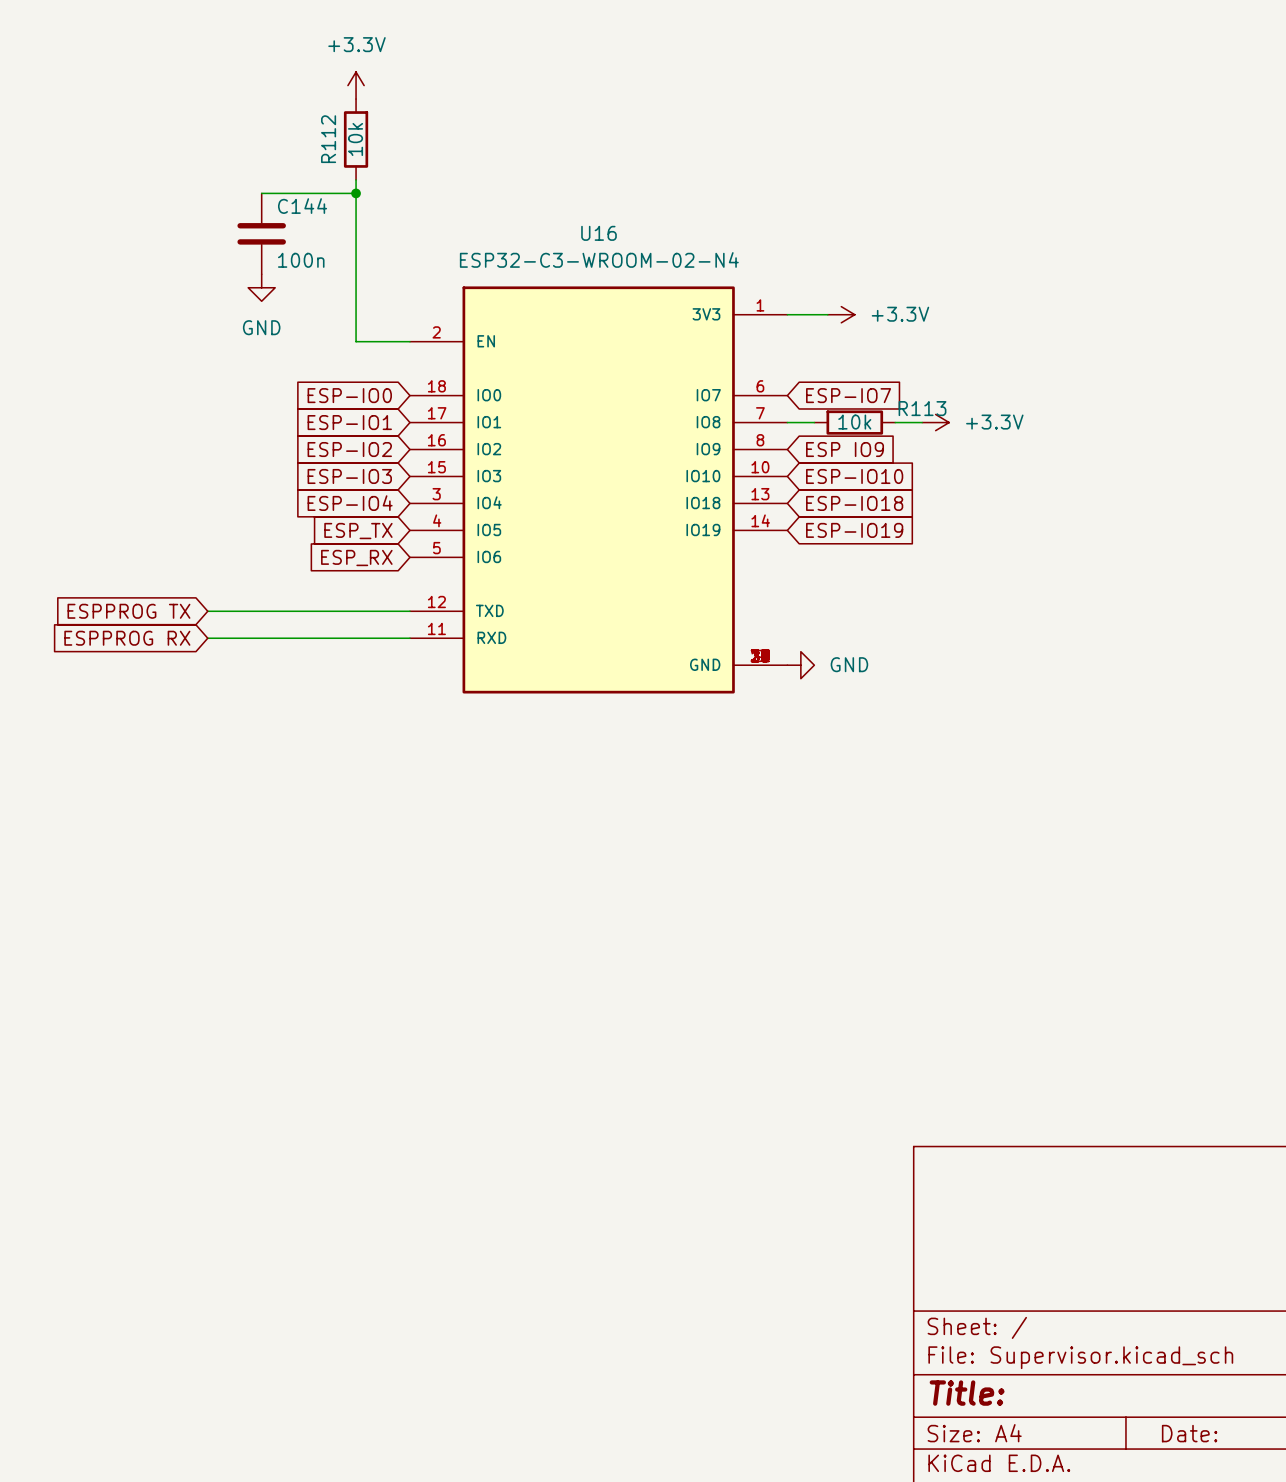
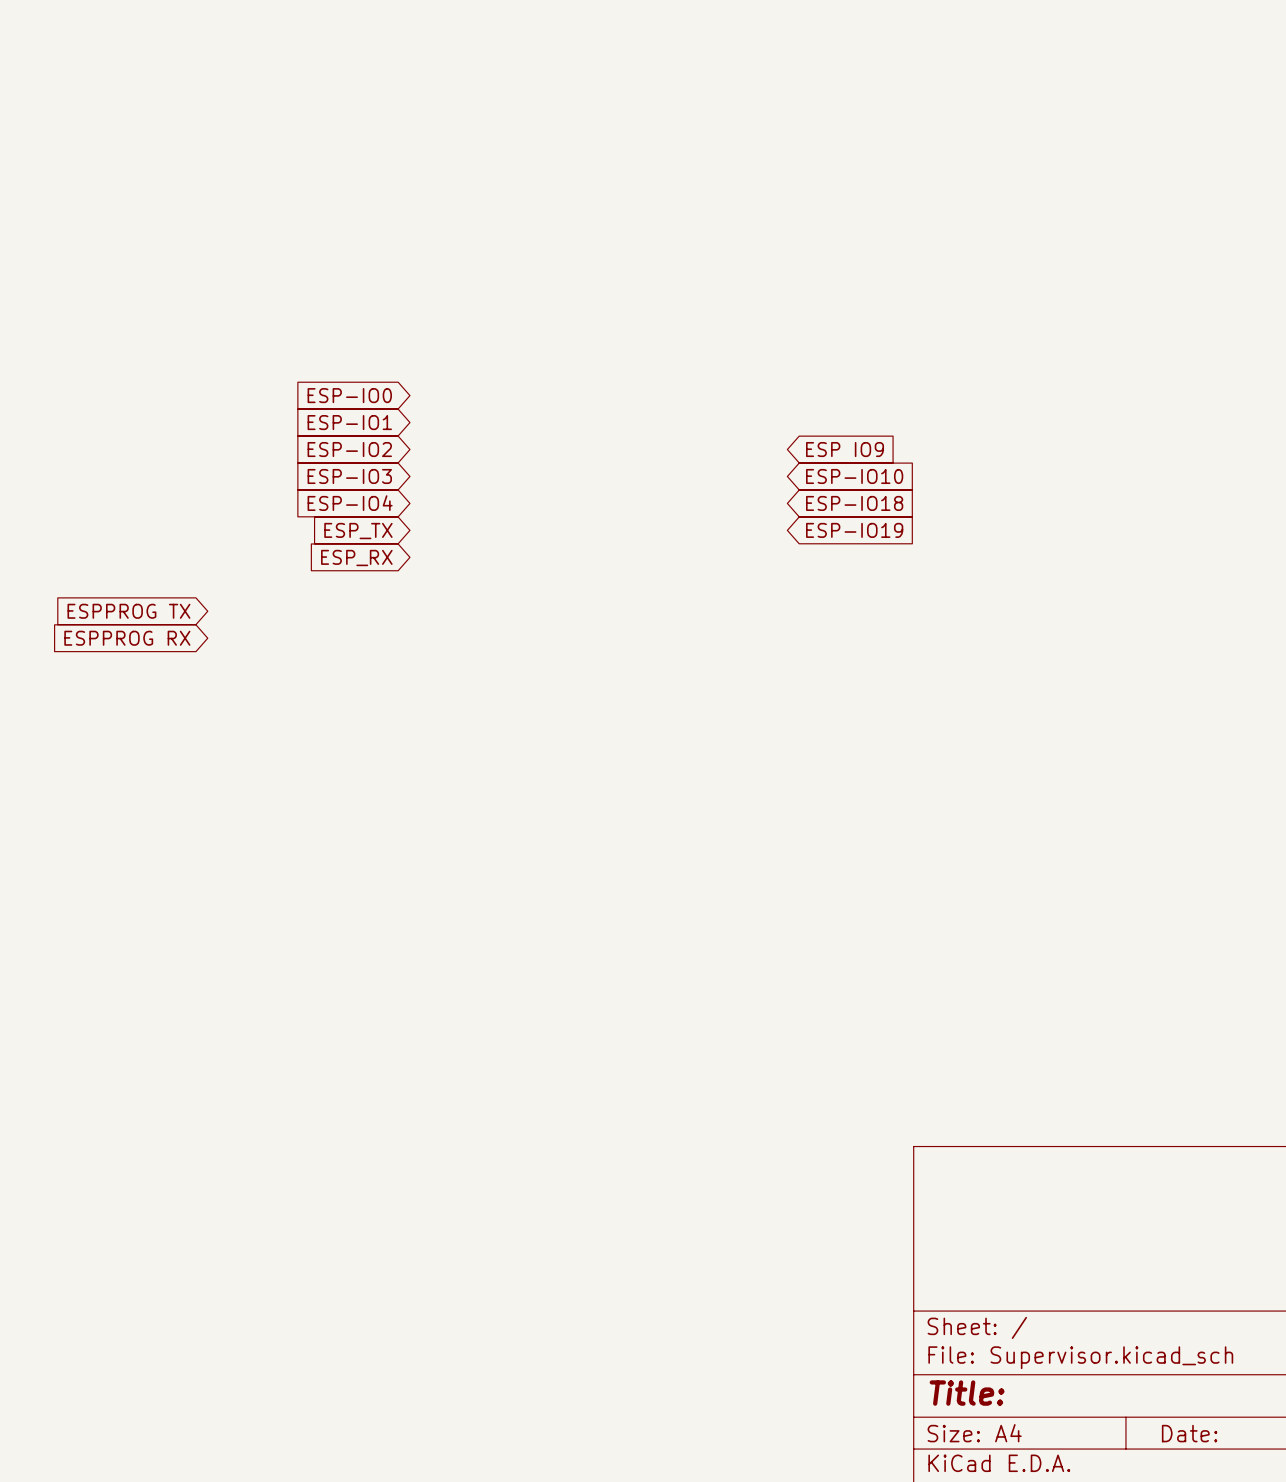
power symbol: +3.3V (356, 85) -> none
R112: 10k (356, 139) -> none
wire: (356, 179) (356, 341) (409, 341) -> none
wire: (261, 193) (356, 193) -> none
junction: (356, 193) -> none
C144: 100n (261, 233) -> none
power symbol: GND (261, 287) -> none
wire: (787, 314) (827, 314) -> none
power symbol: +3.3V (841, 314) -> none
global label: ESP-IO7 (848, 395) -> none
wire: (787, 422) (814, 422) -> none
R113: 10k (854, 422) -> none
wire: (895, 422) (922, 422) -> none
power symbol: +3.3V (935, 422) -> none
U16: ESP32-C3-WROOM-02-N4 (598, 489) -> none
wire: (207, 611) (409, 611) -> none
wire: (207, 638) (409, 638) -> none
power symbol: GND (800, 665) -> none

